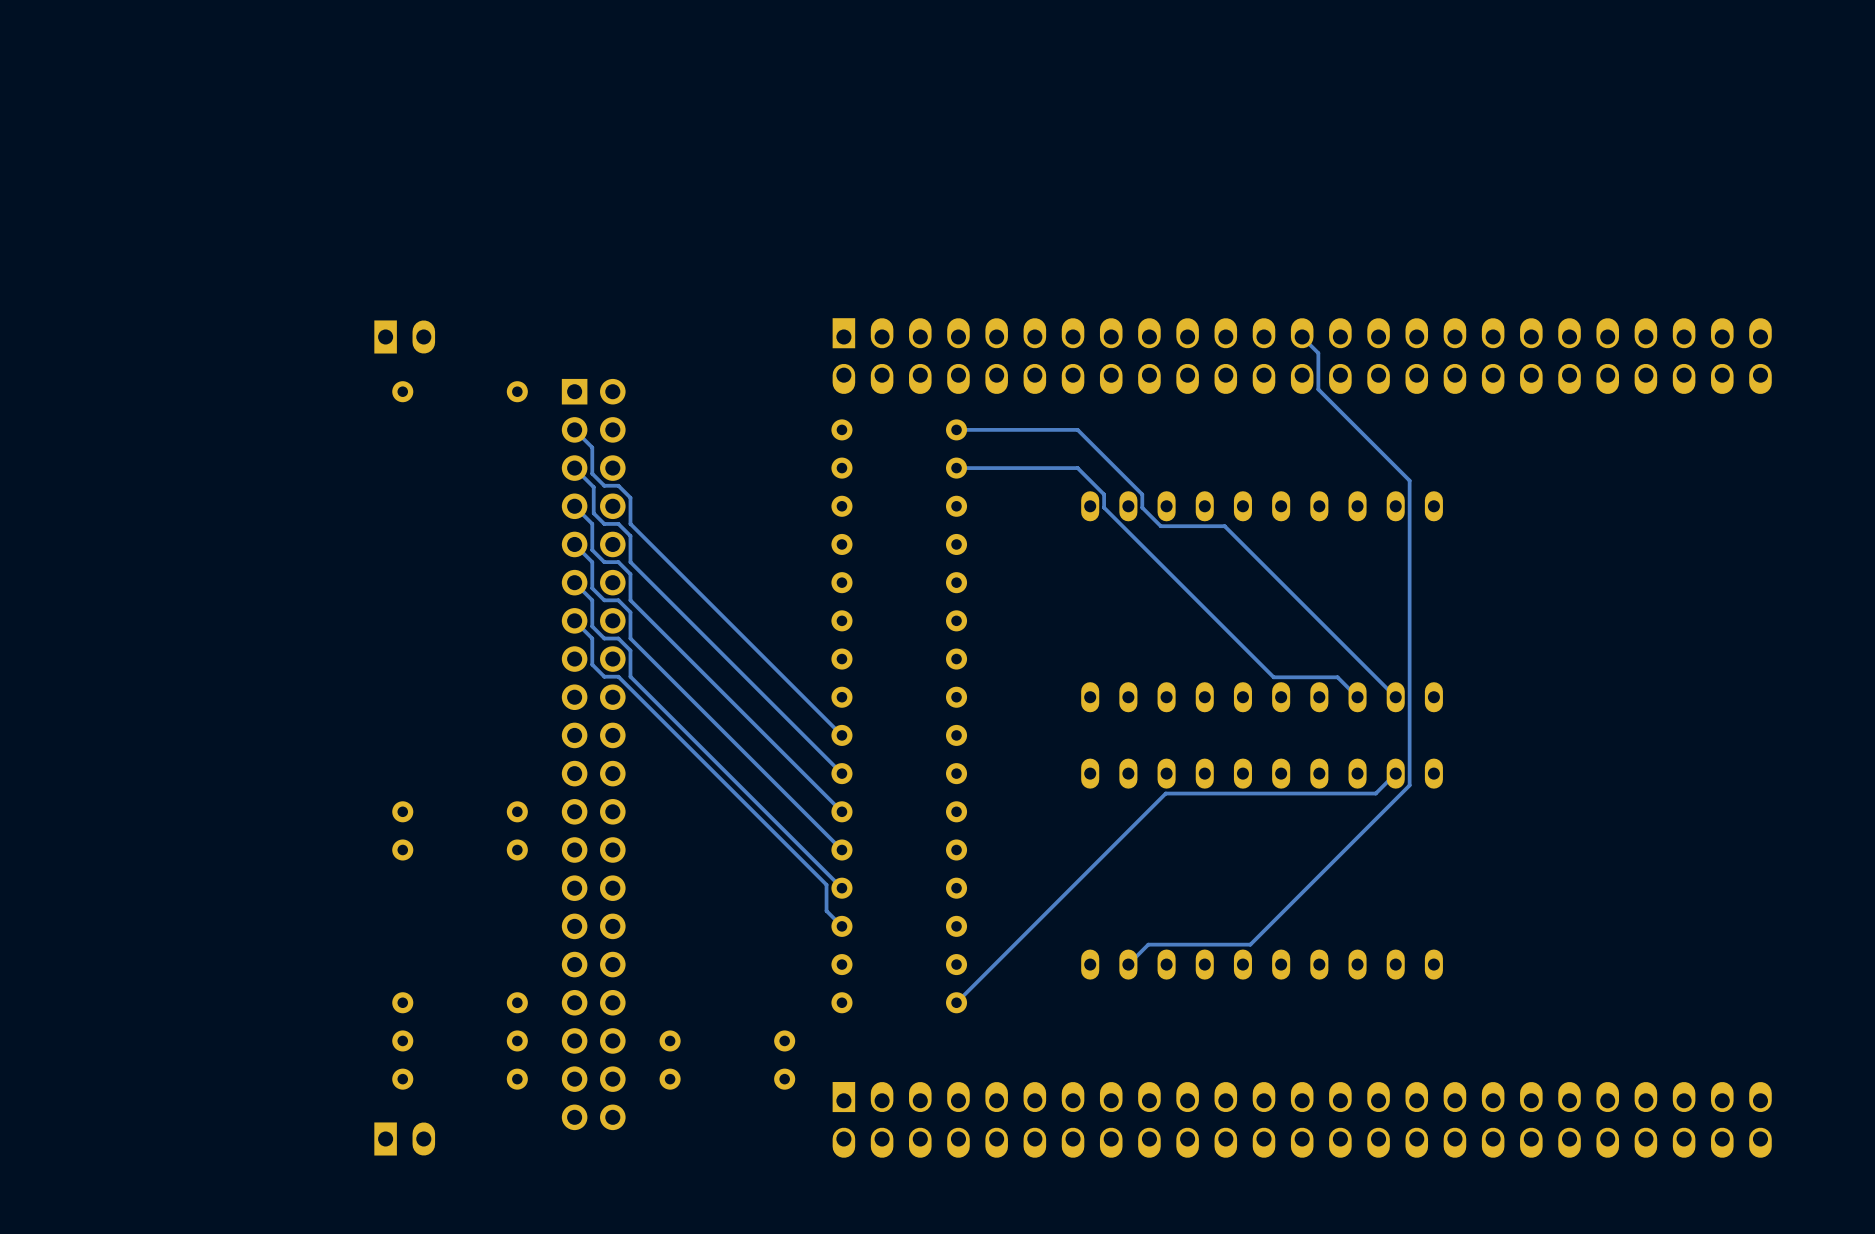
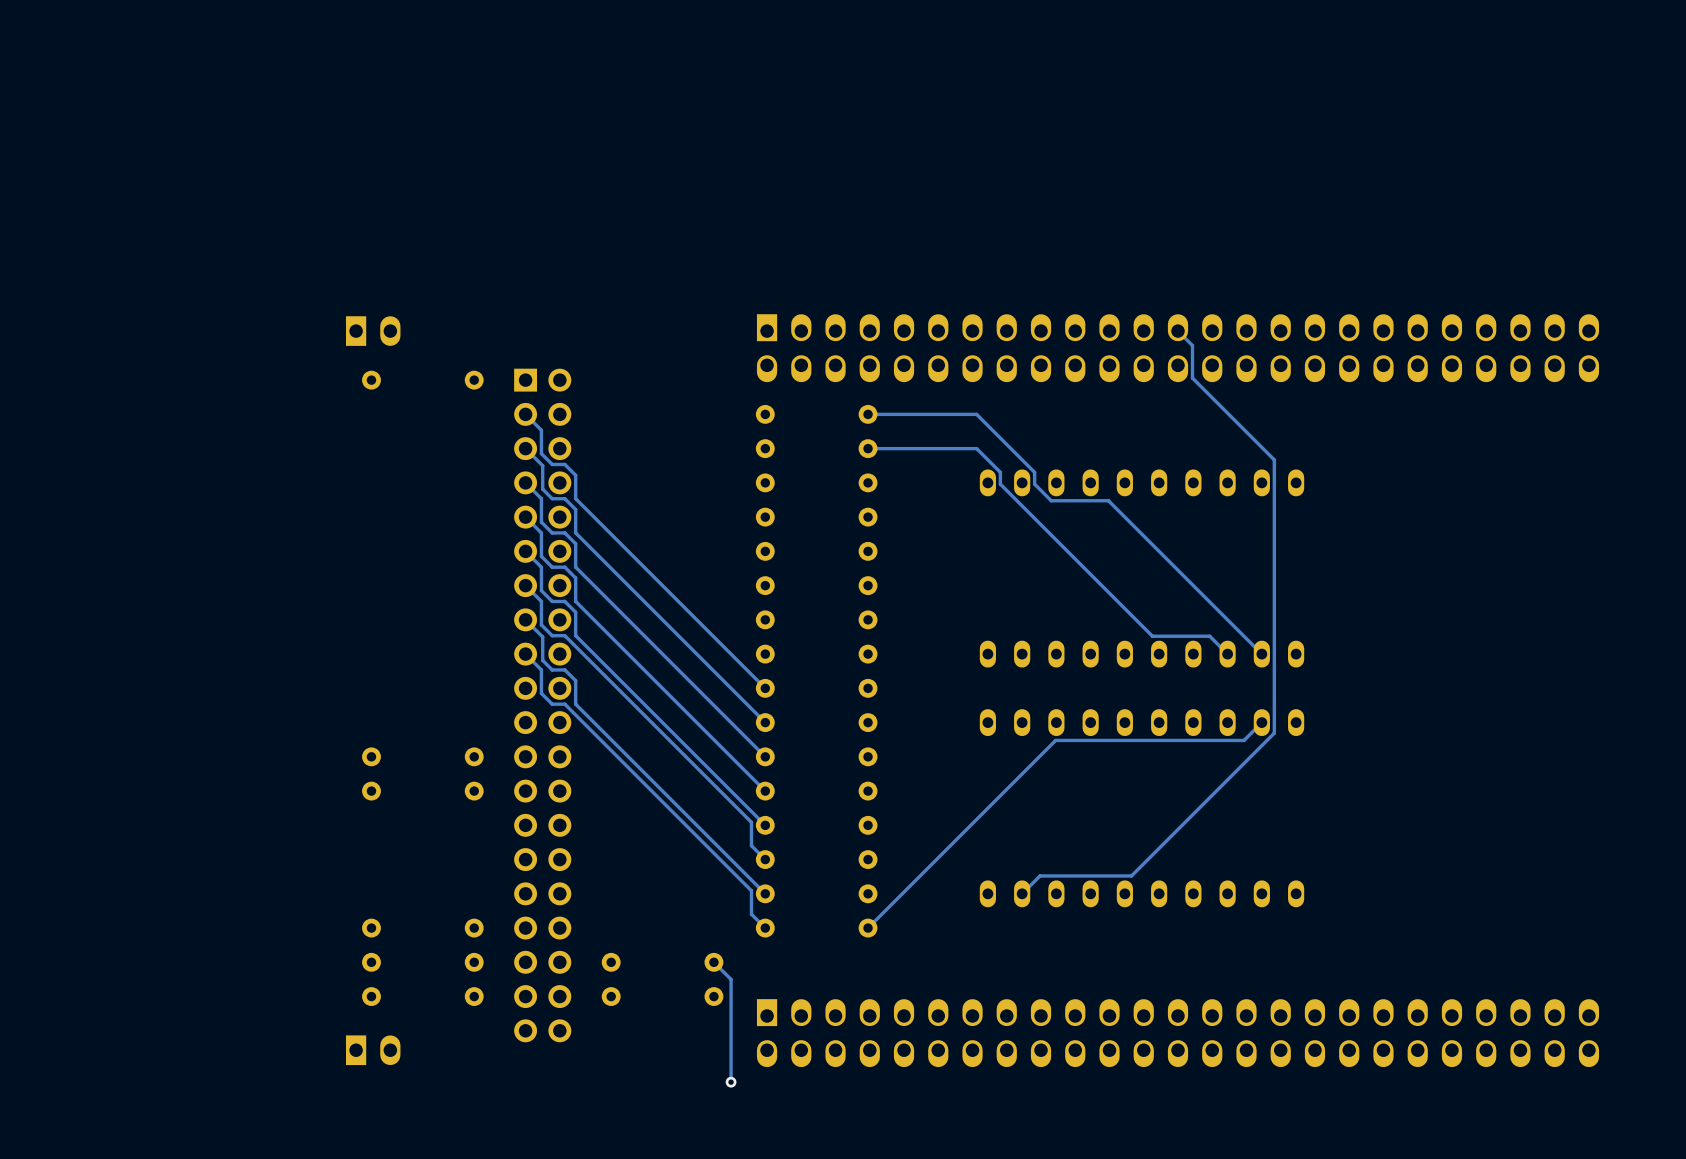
track: none -> (525, 619) (542, 636) (542, 660) (552, 669) (564, 669) (575, 680) (575, 704) (765, 893)
track: none -> (525, 654) (541, 669) (541, 693) (552, 704) (564, 704) (751, 890) (751, 914) (765, 928)
track: none -> (713, 962) (731, 979) (731, 1082)
via: none -> (731, 1082)

